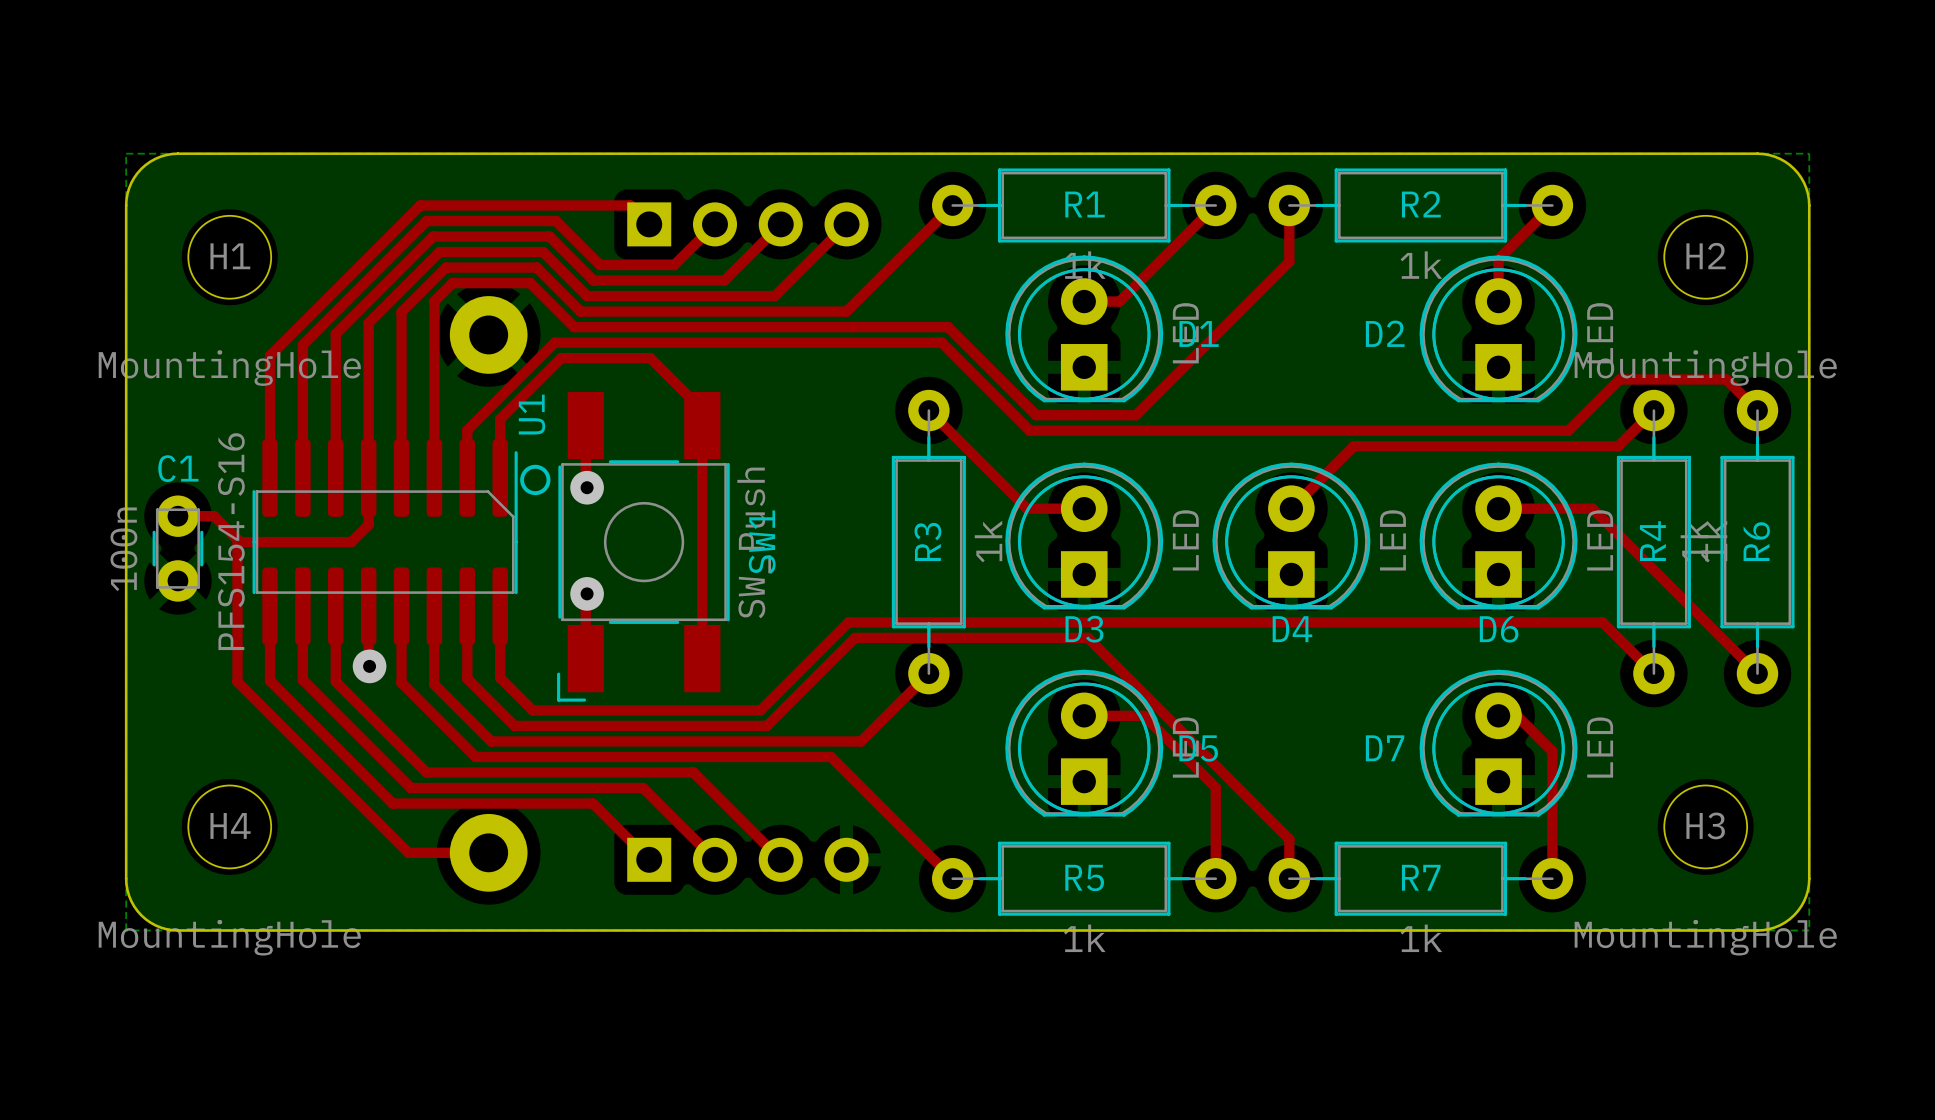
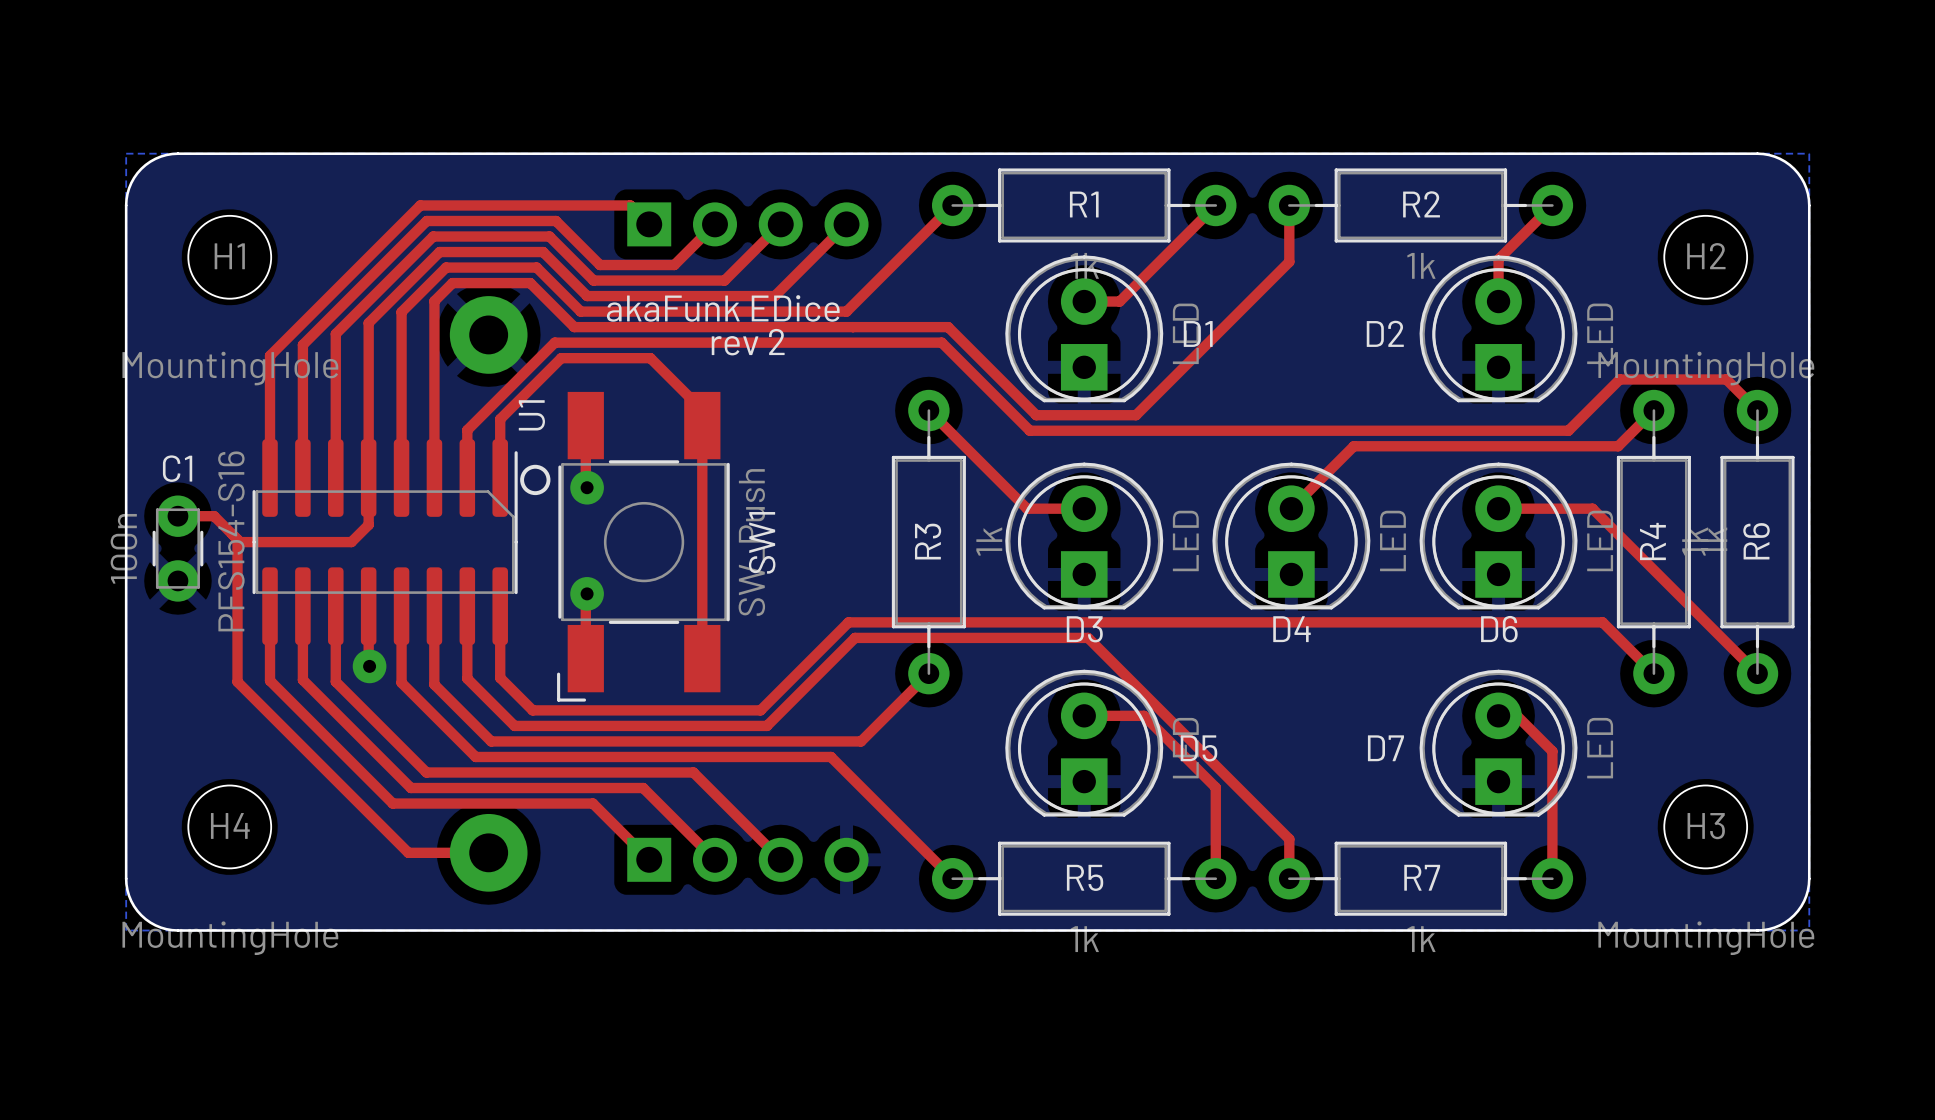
text: none -> akaFunk EDice (723, 308)
text: none -> rev 2 (748, 342)

